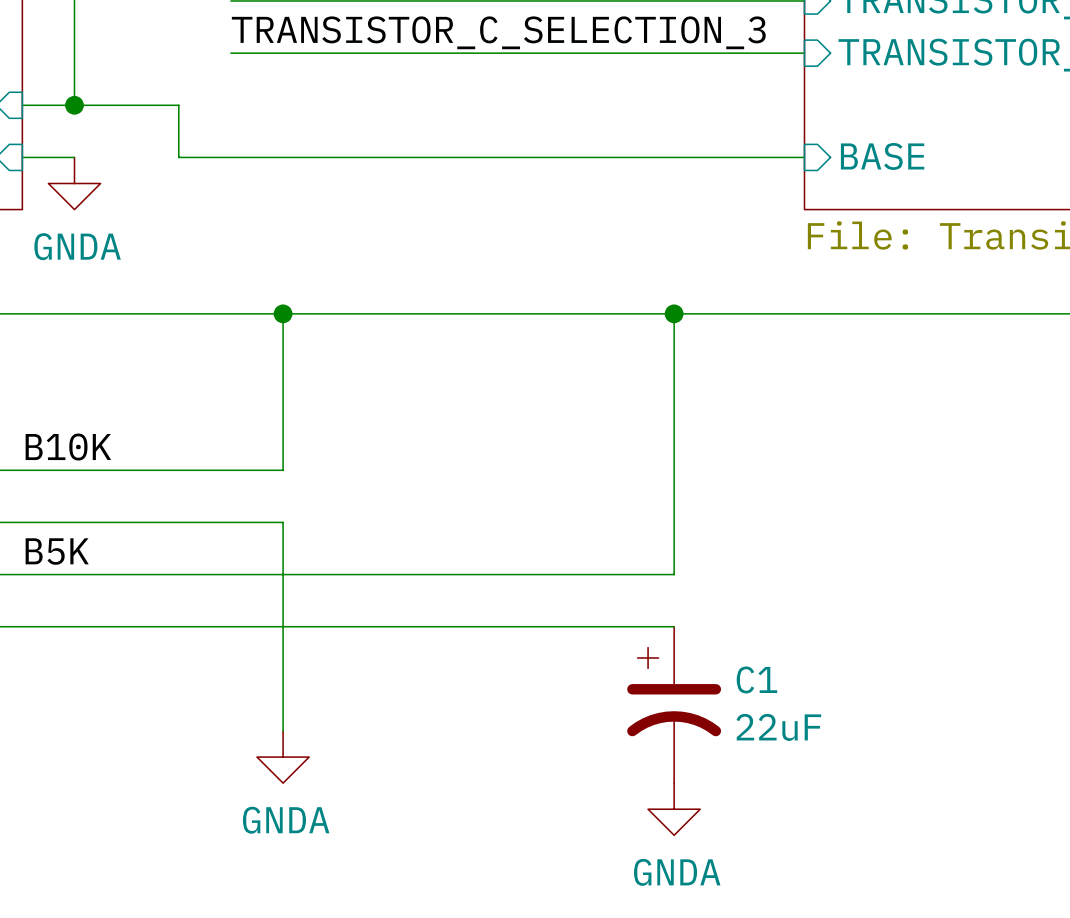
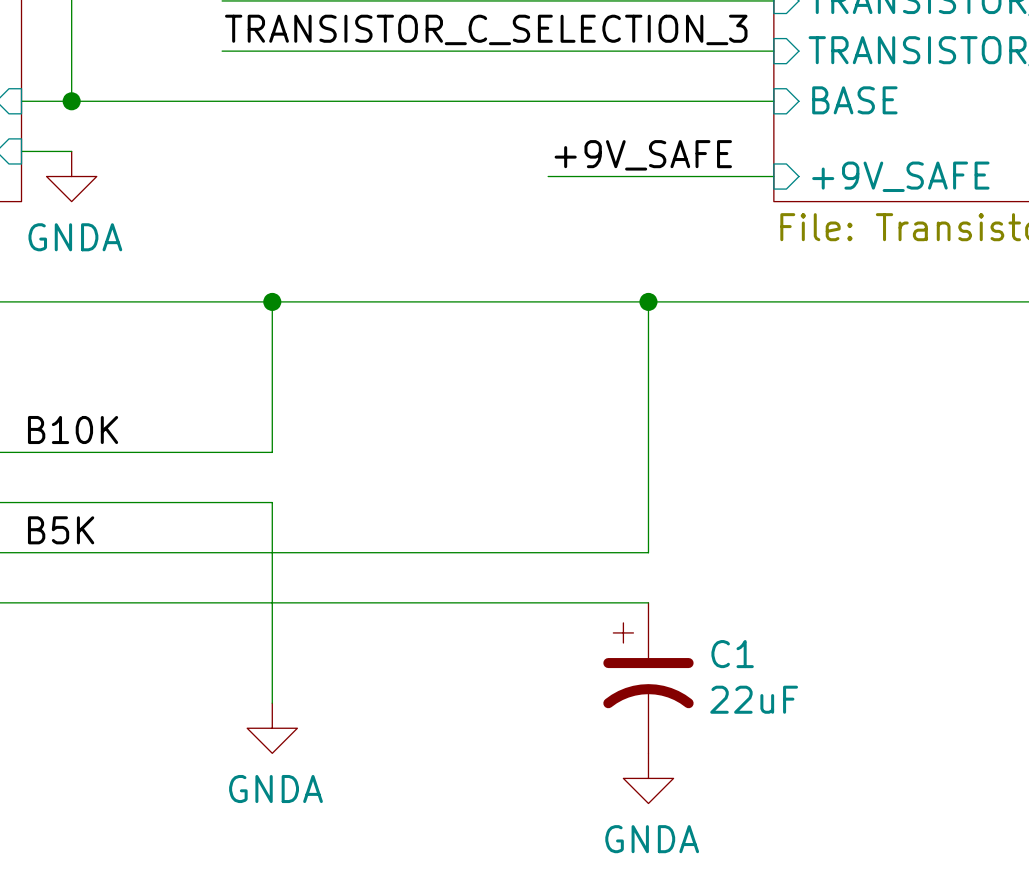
wire: (178, 105) (178, 157) (804, 157) -> (171, 101) (773, 101)
sheet pin position: BASE (882, 156) -> BASE (854, 100)
label: none -> +9V_SAFE (643, 155)
wire: none -> (548, 176) (773, 176)
sheet pin: none -> +9V_SAFE (900, 176)

